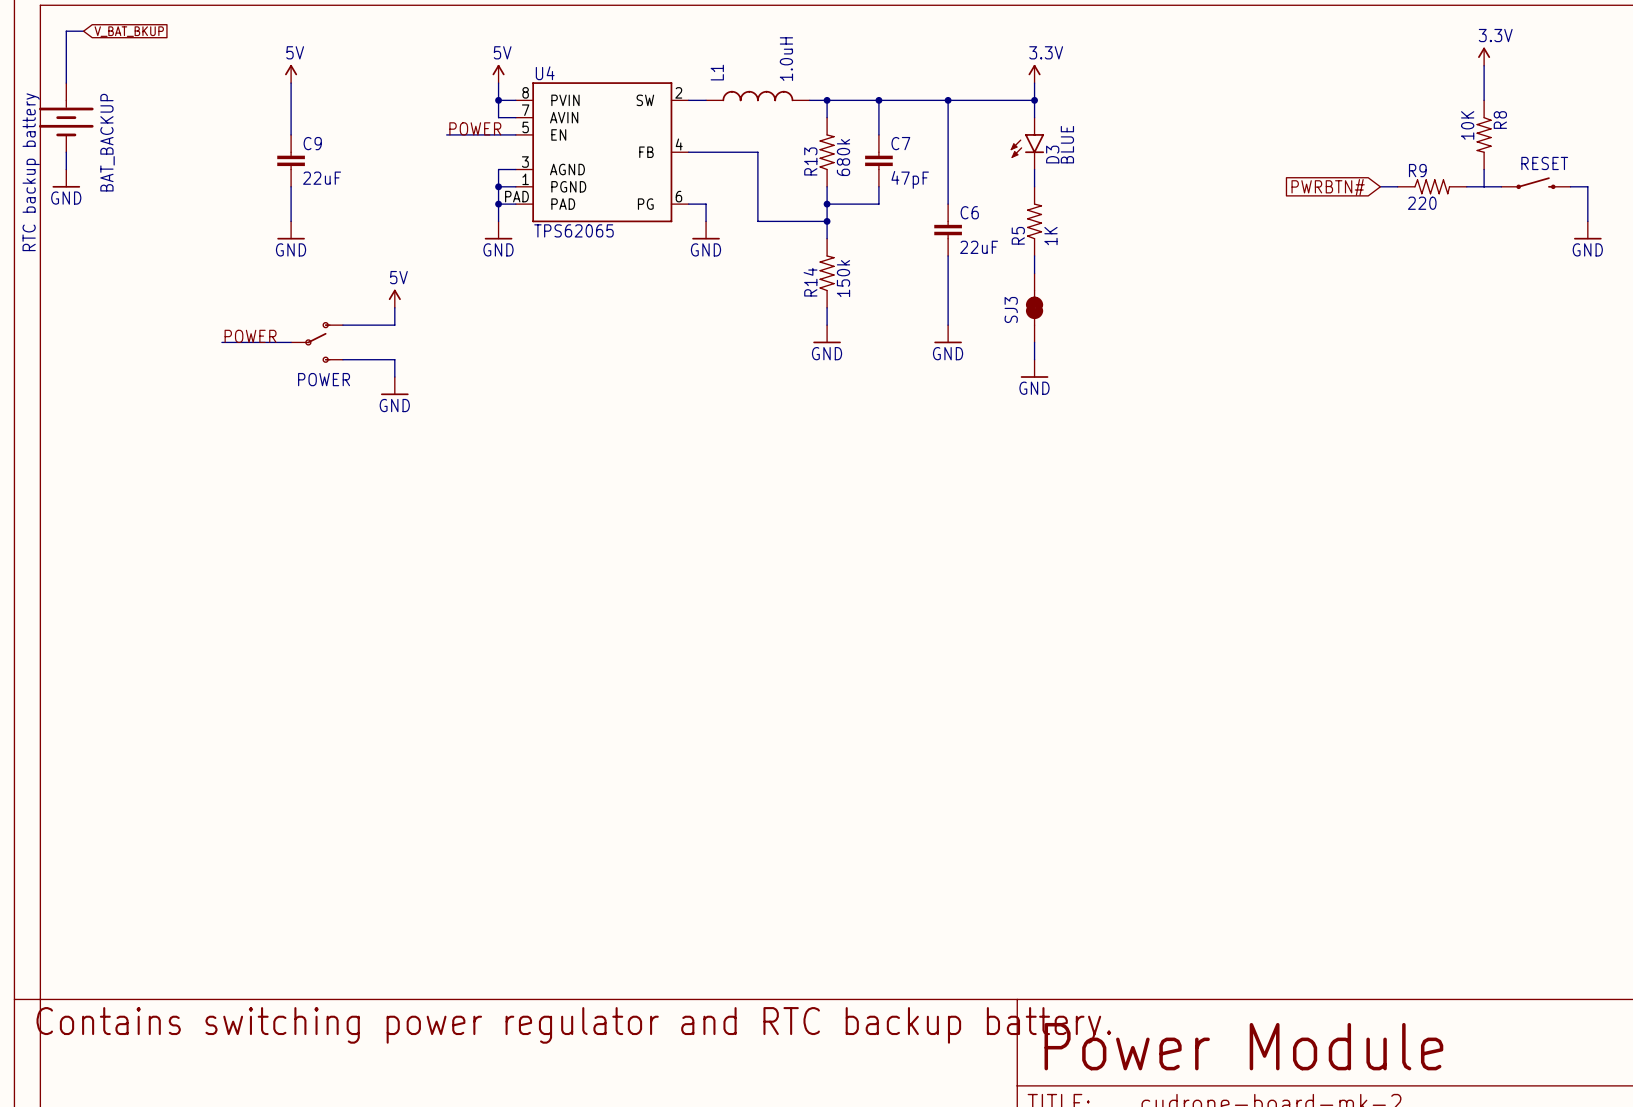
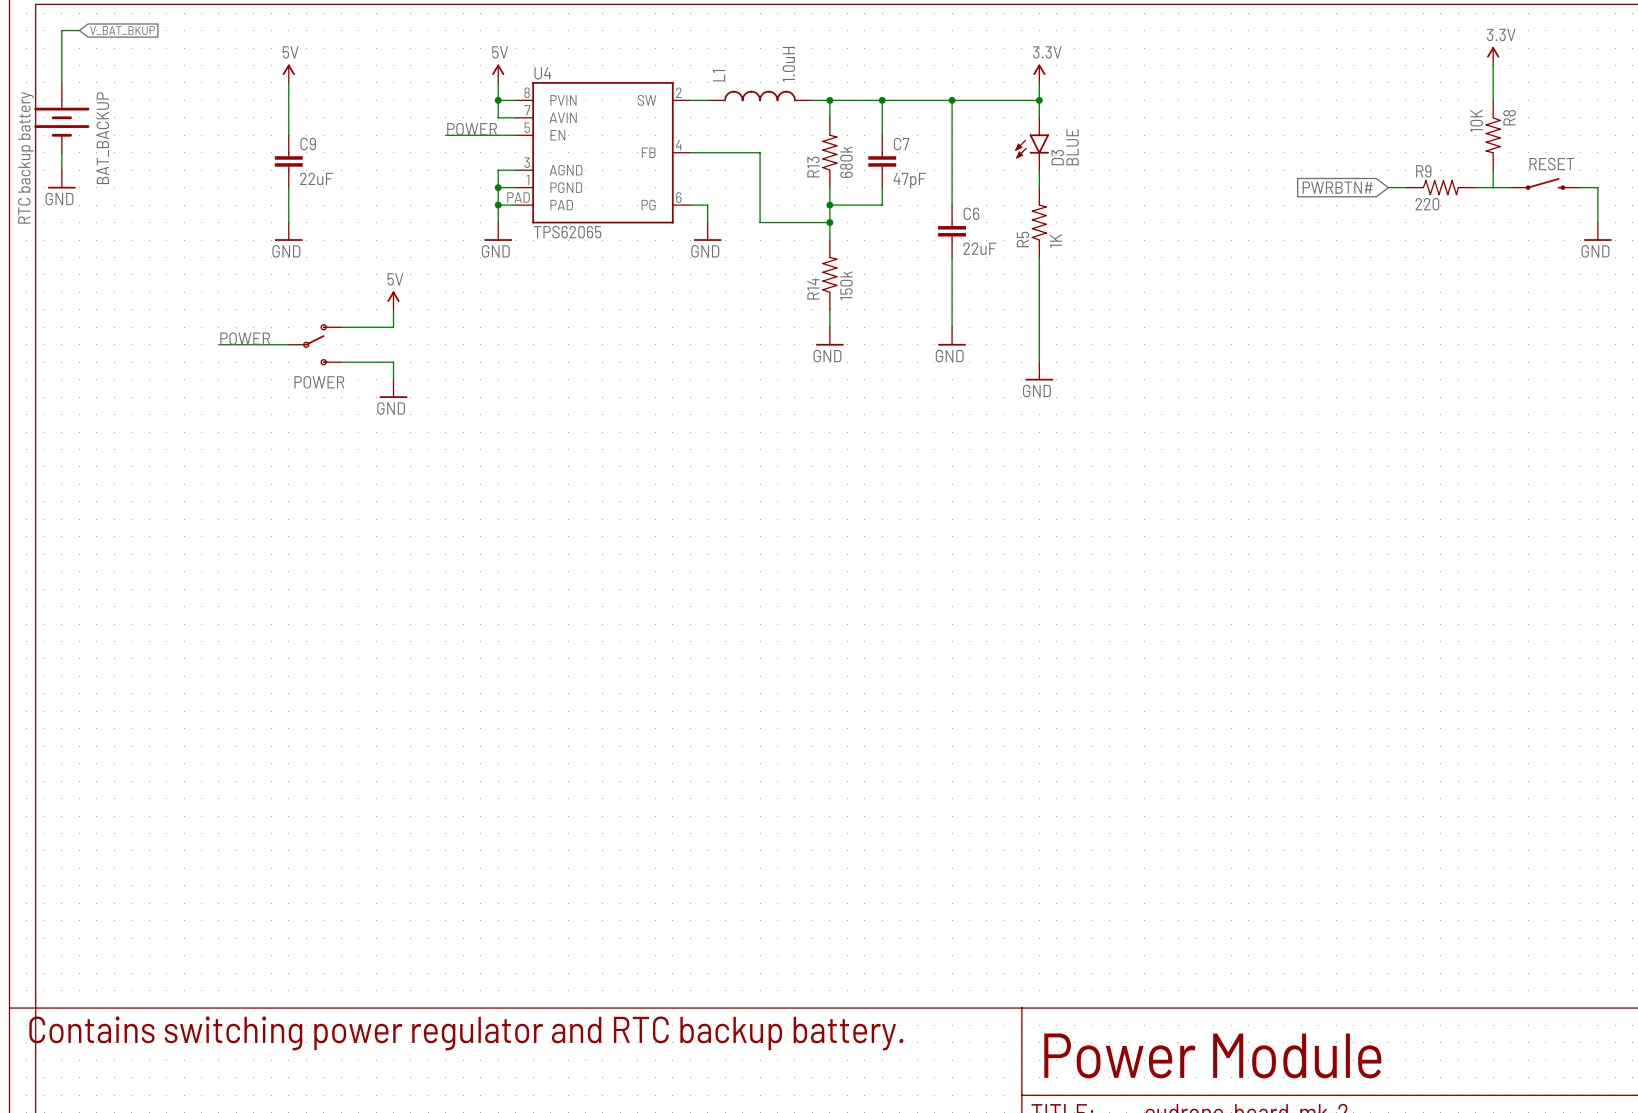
SJ3: (1034, 307) -> none

